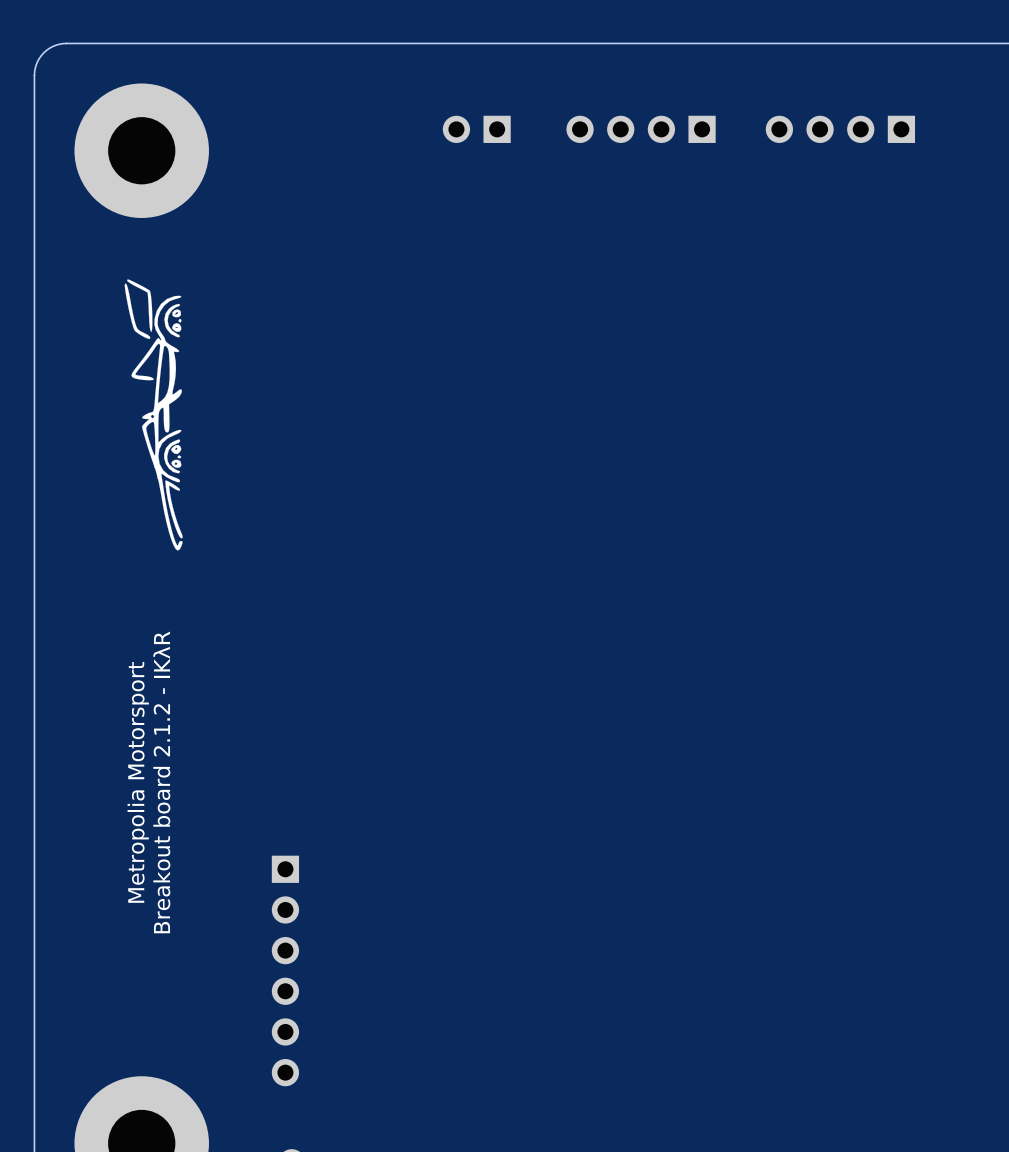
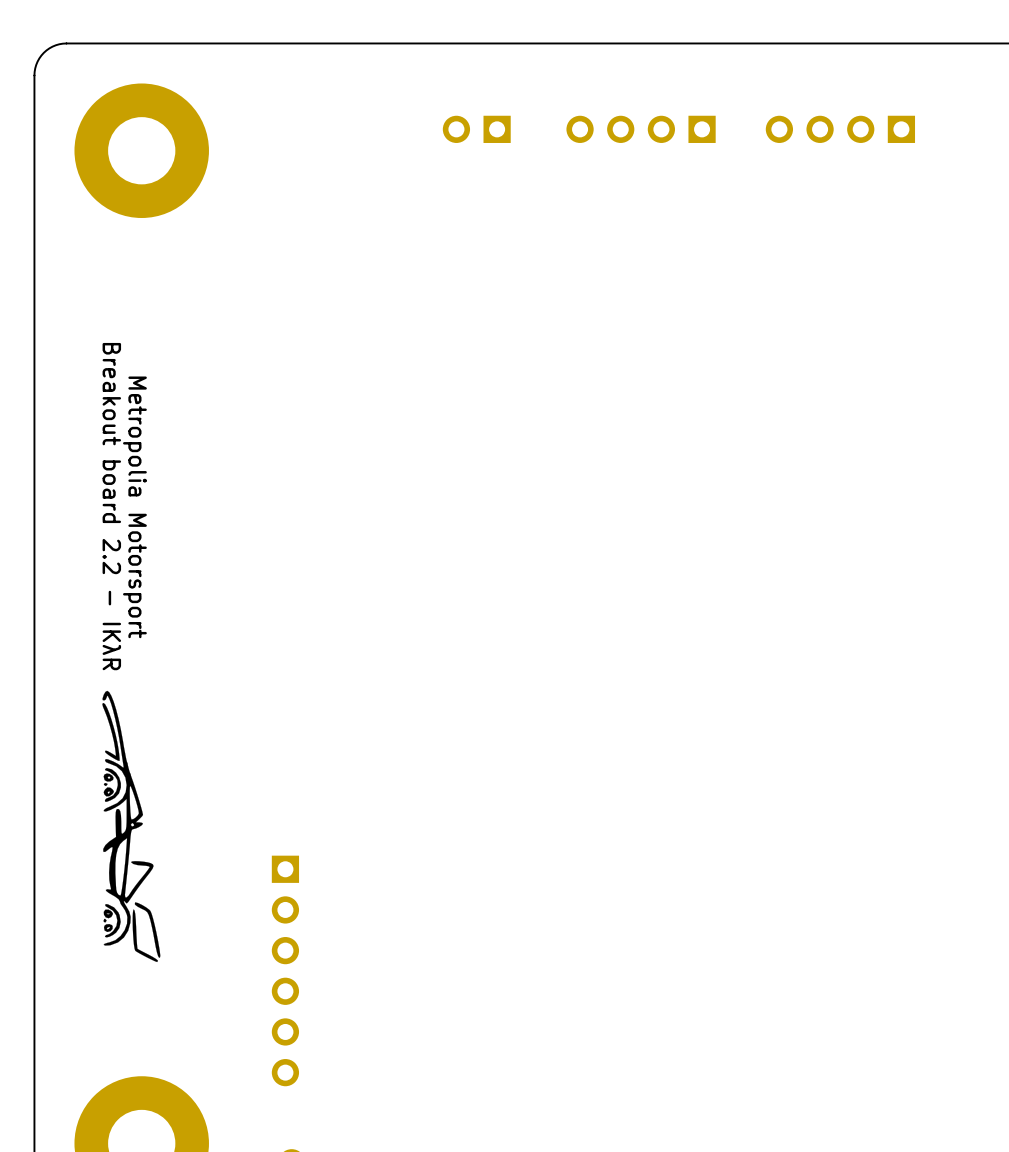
drawing: [124, 279, 183, 551] -> none
text: none -> Breakout board 2.2 - IKλR (111, 506)
drawing: none -> [102, 690, 161, 963]
text rotation: 0° (138, 782) -> 180° (134, 507)
text: Breakout board 2.1.2 - IKλR (161, 782) -> none

